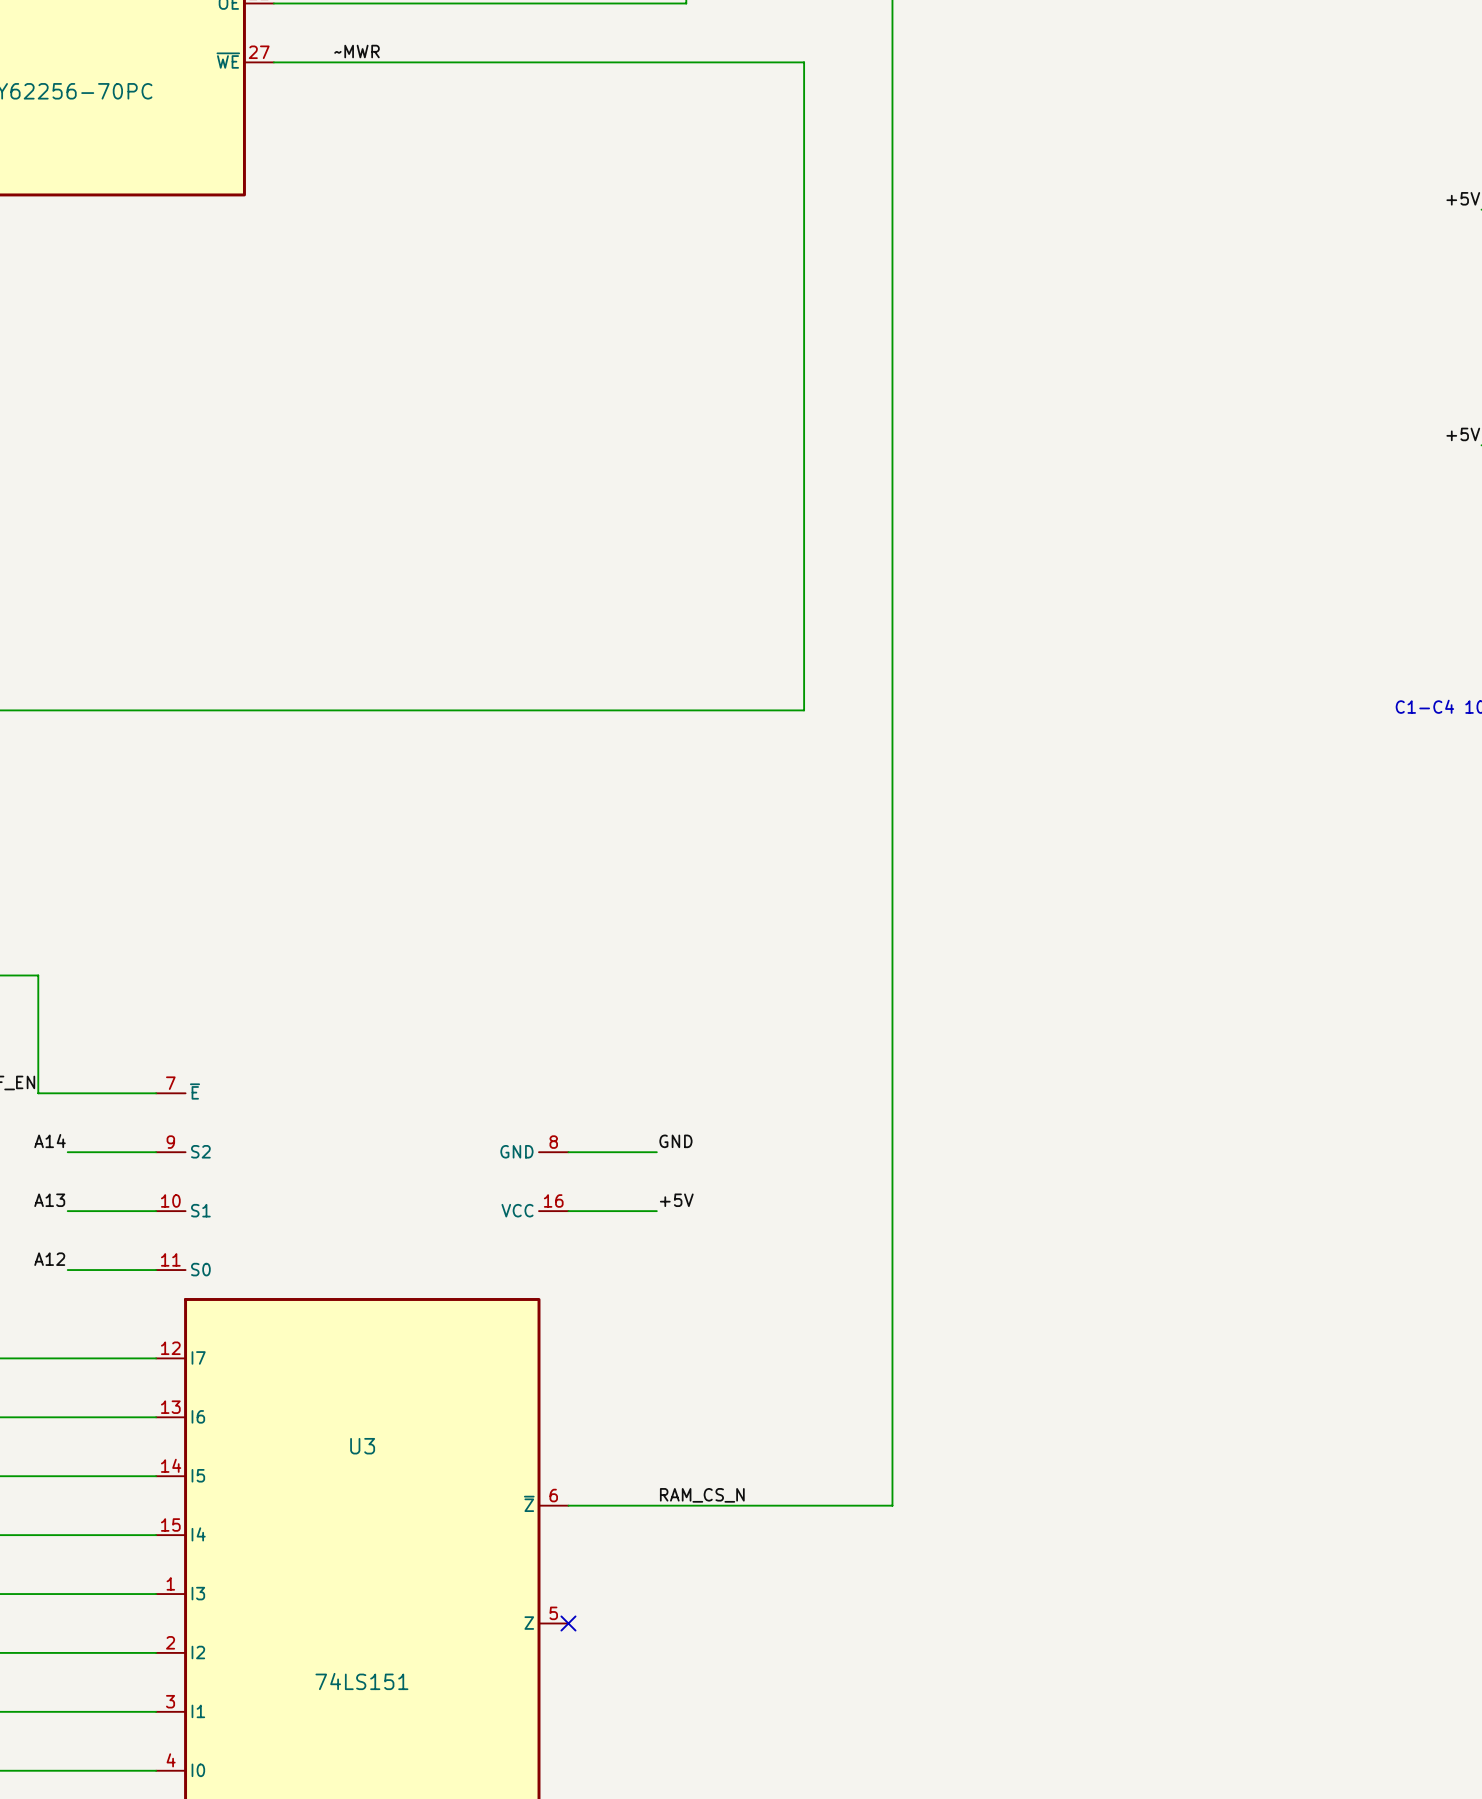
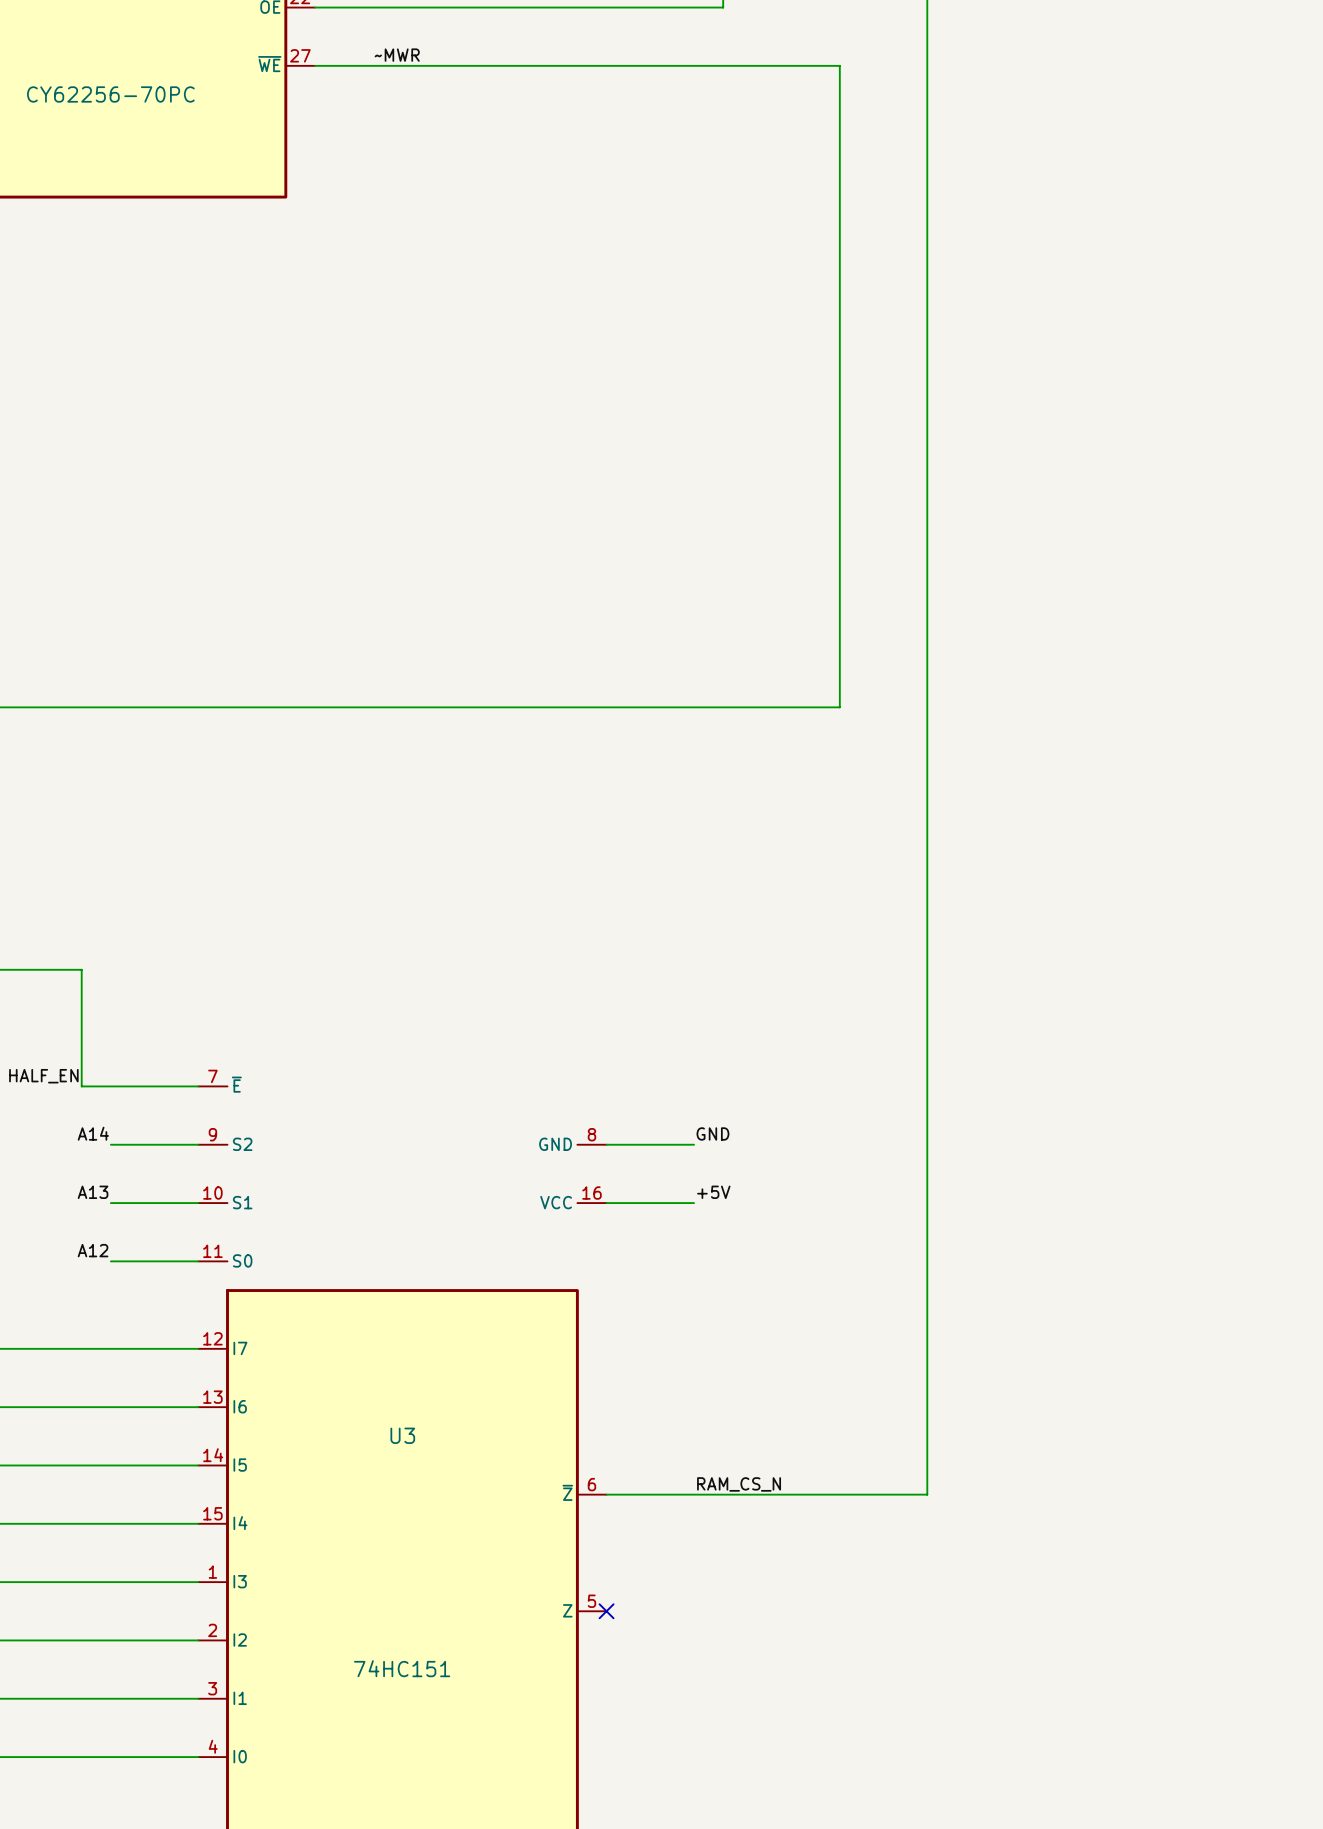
U3 value: 74LS151 (361, 1681) -> 74HC151 (402, 1668)

